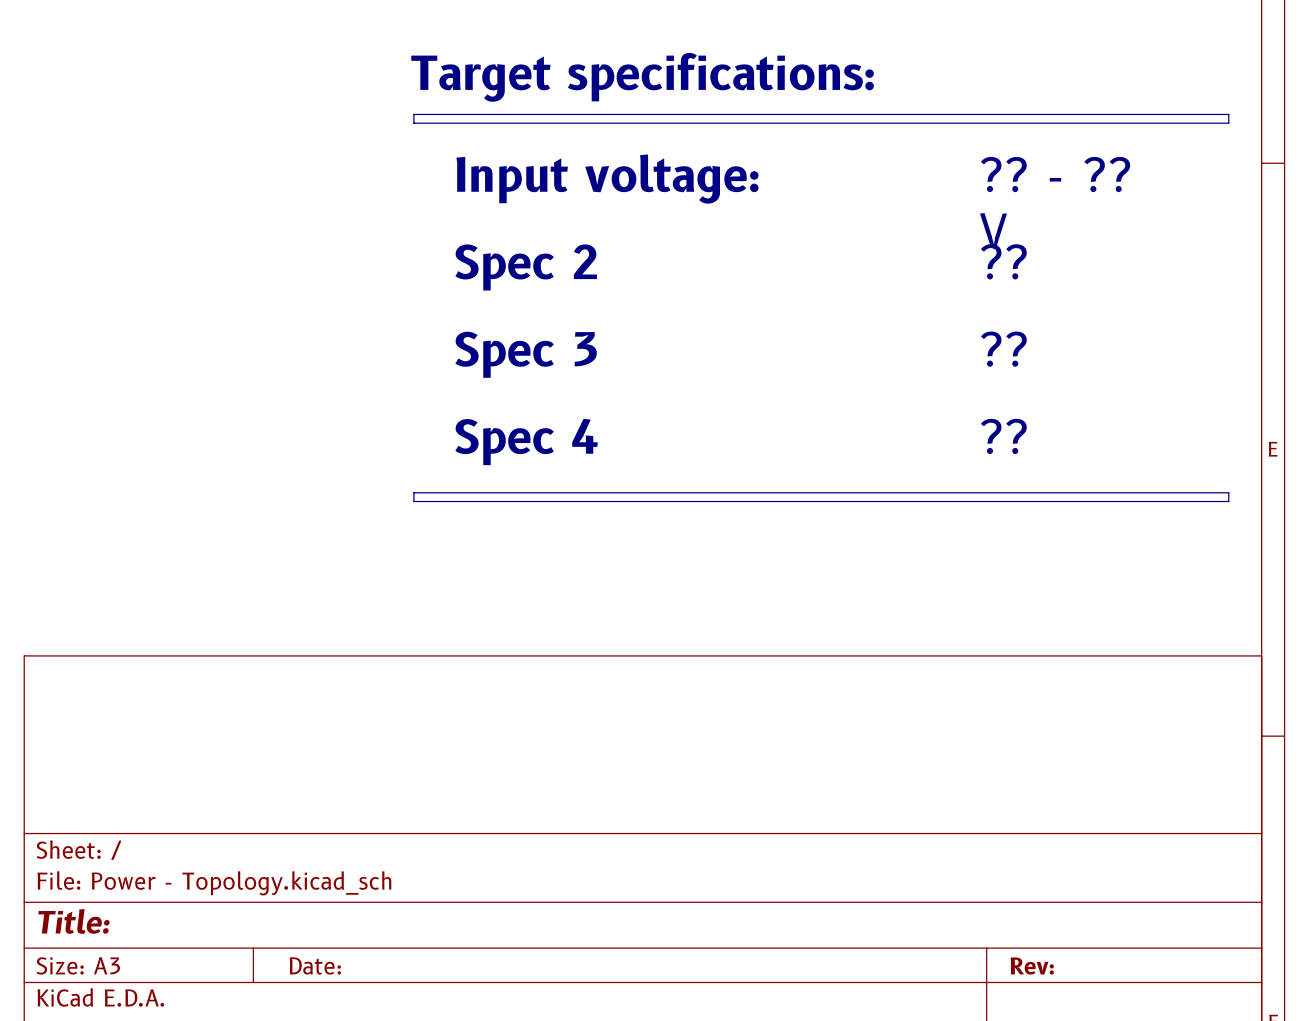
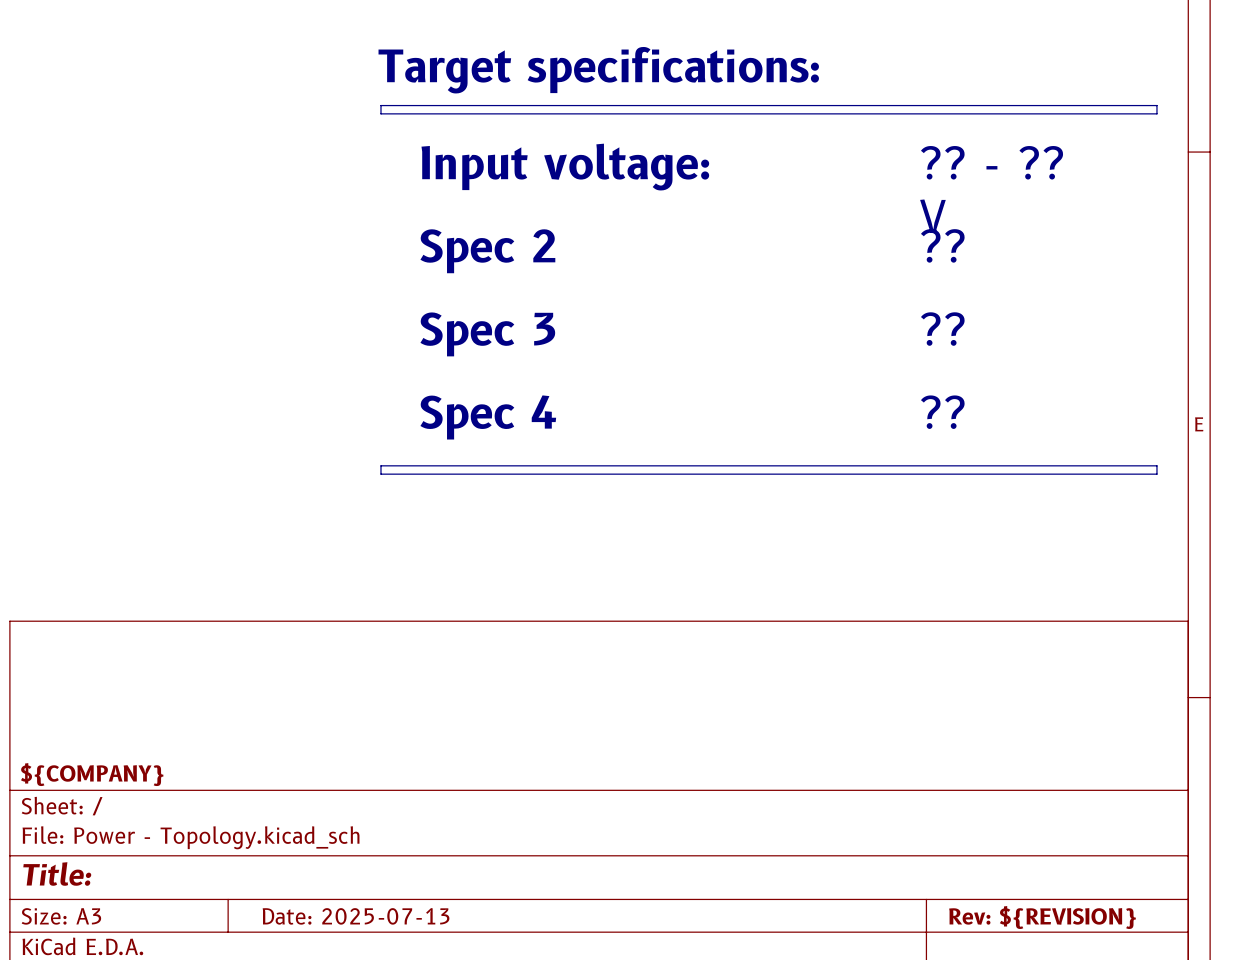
title block: none -> ${COMPANY} (92, 774)
title block: Date: (315, 965) -> Date: 2025-07-13 (356, 916)
title block: Rev: (1032, 966) -> Rev: ${REVISION} (1042, 917)

